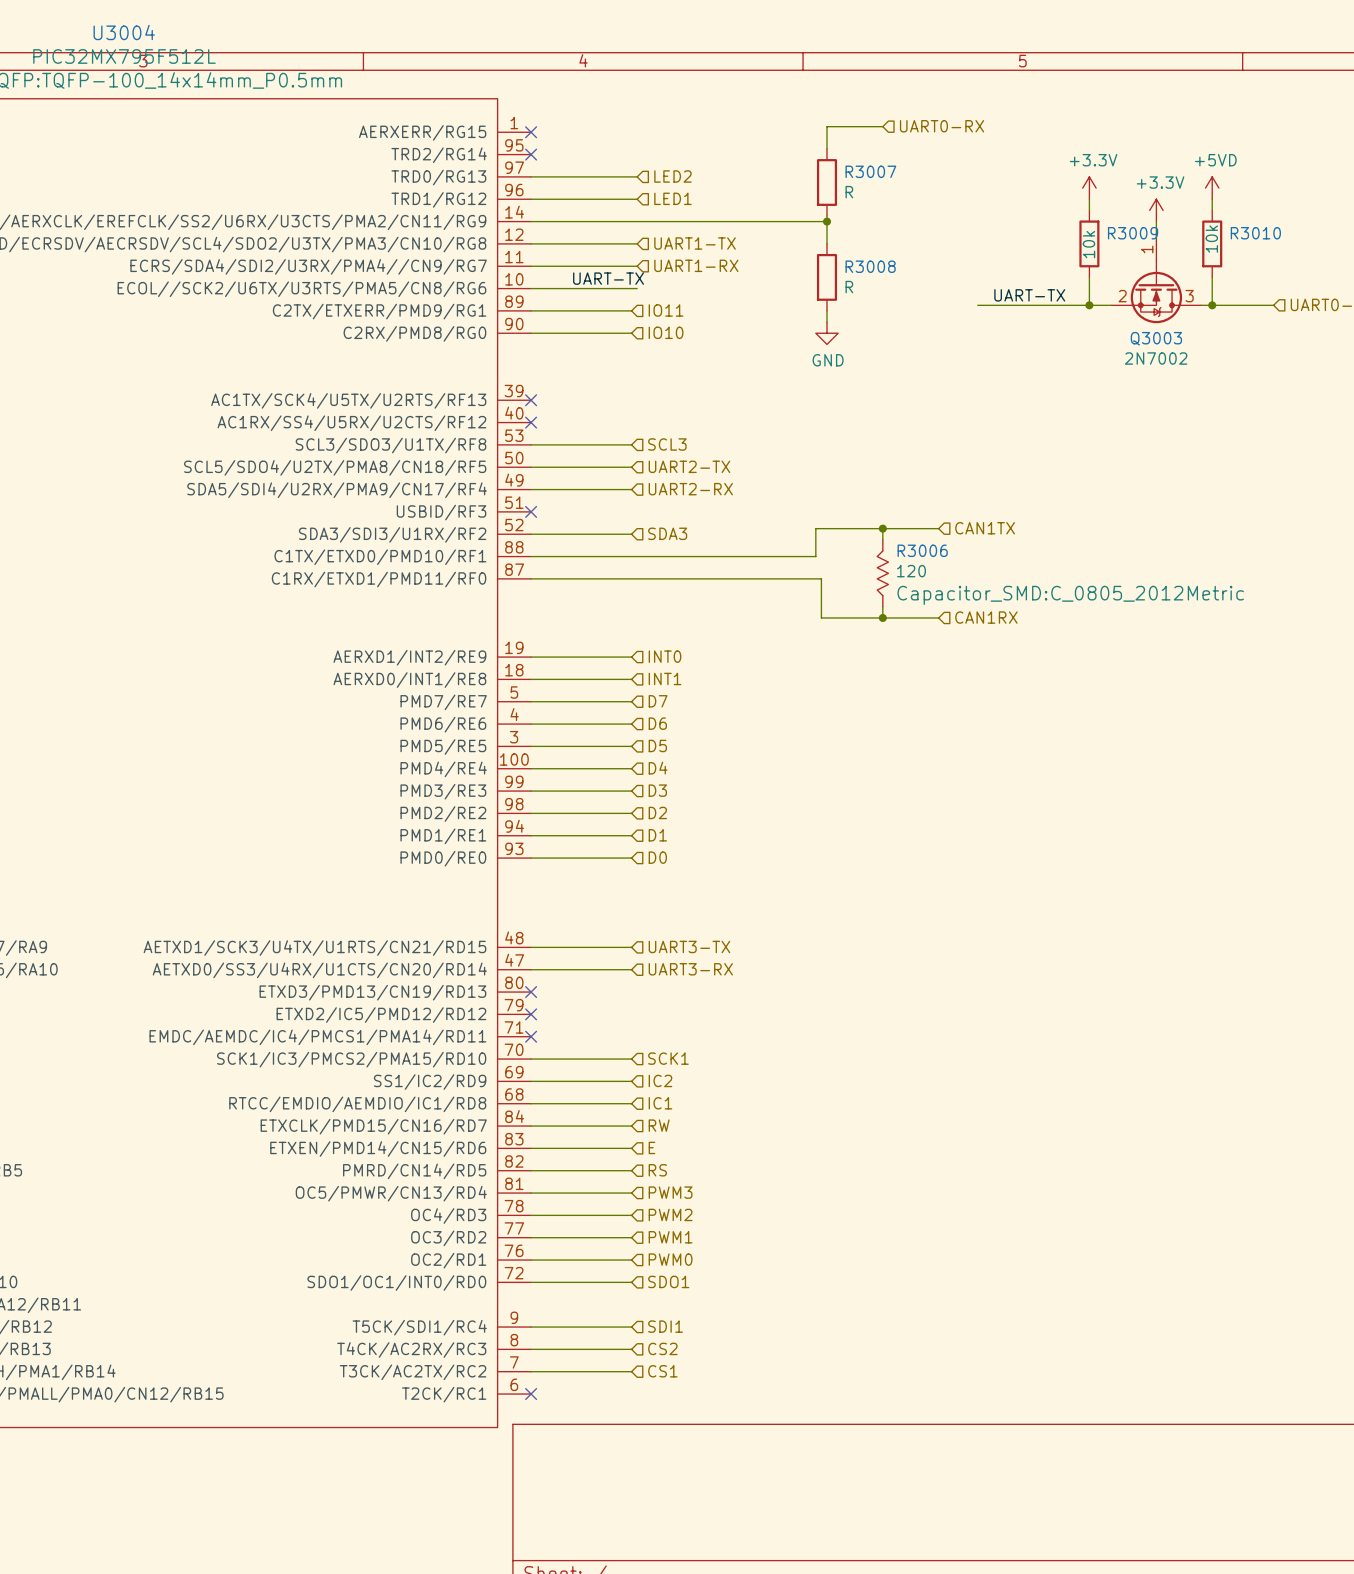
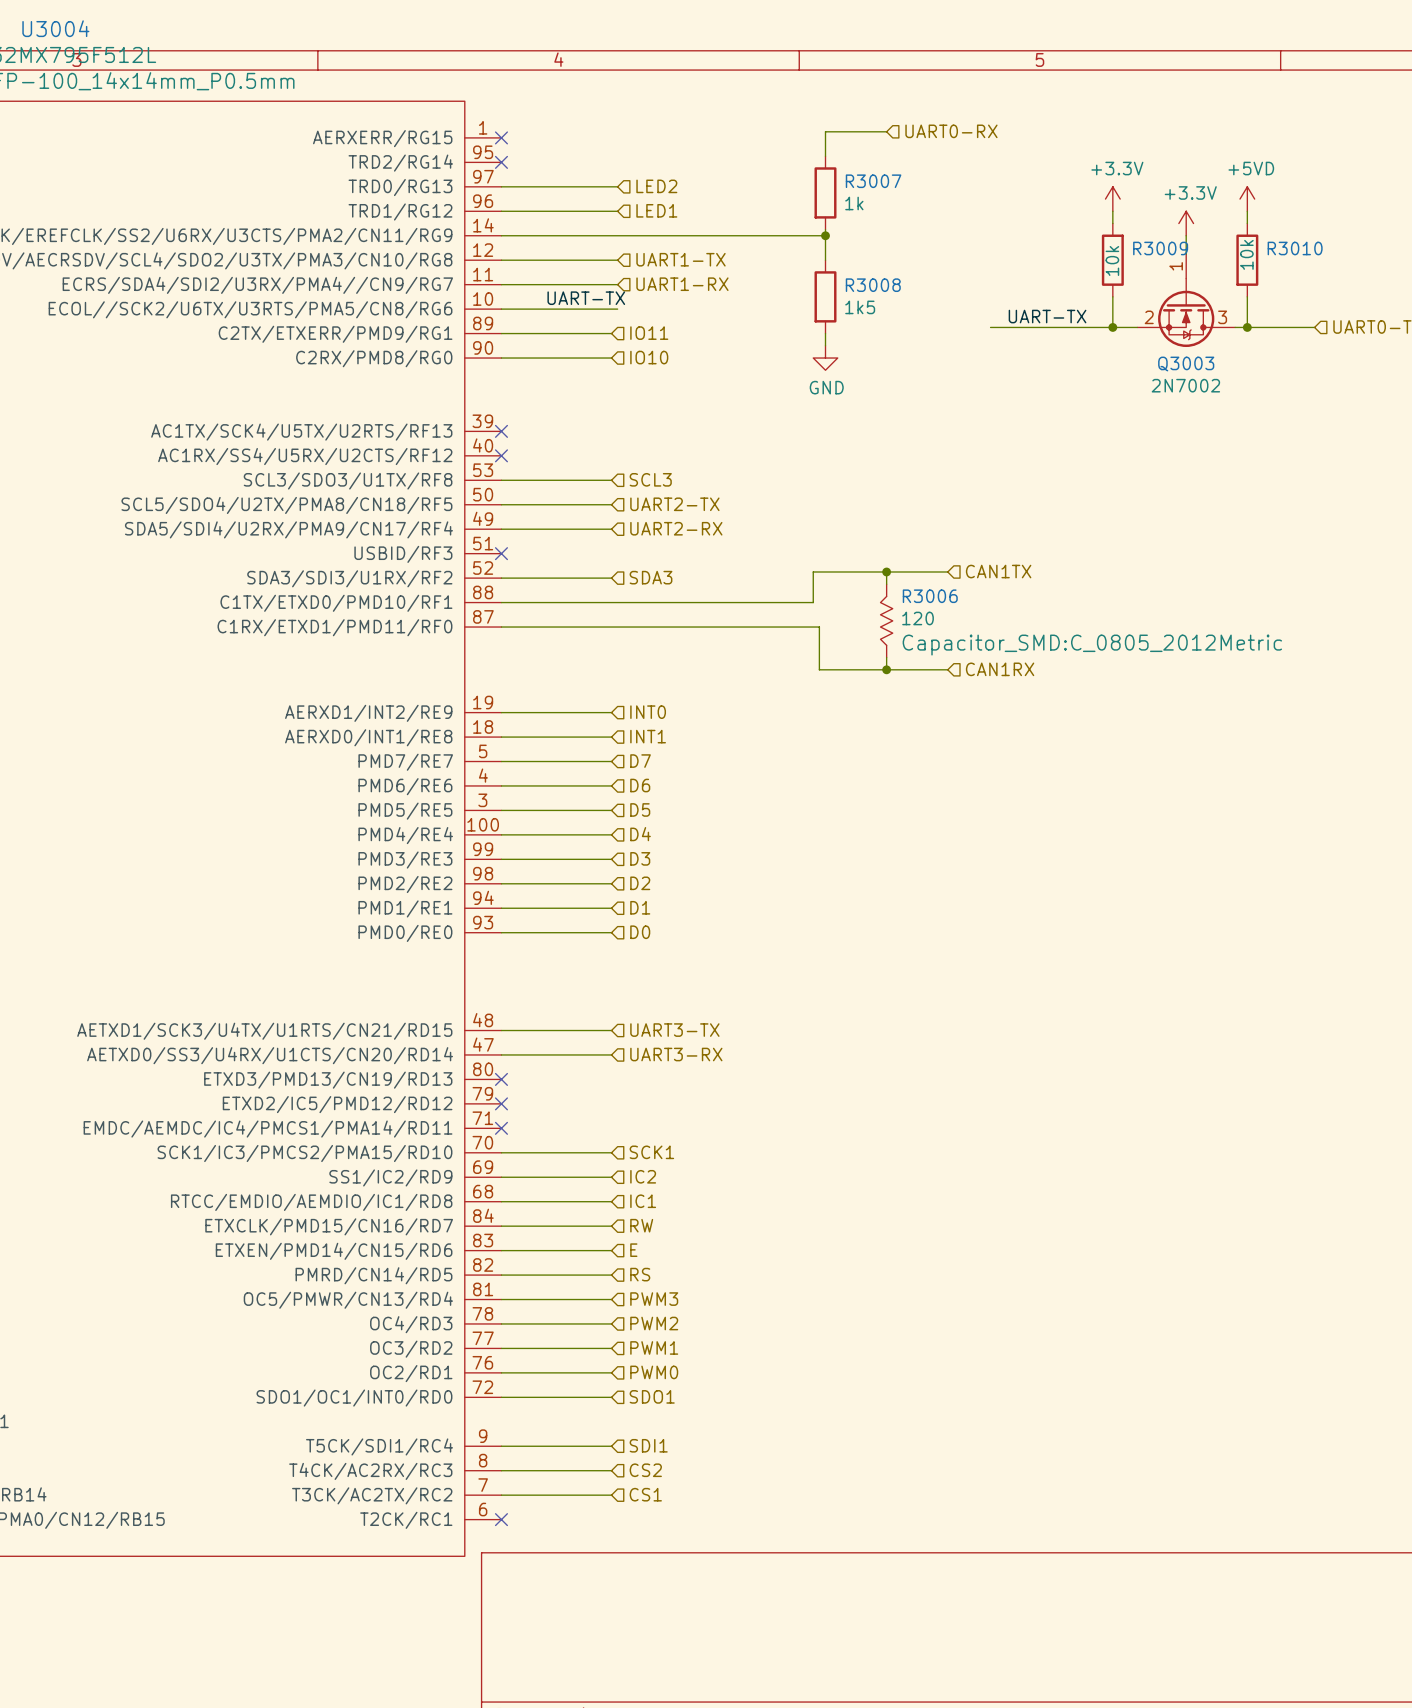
R3007 value: R (849, 192) -> 1k (854, 203)
R3008 value: R (849, 287) -> 1k5 (860, 307)

